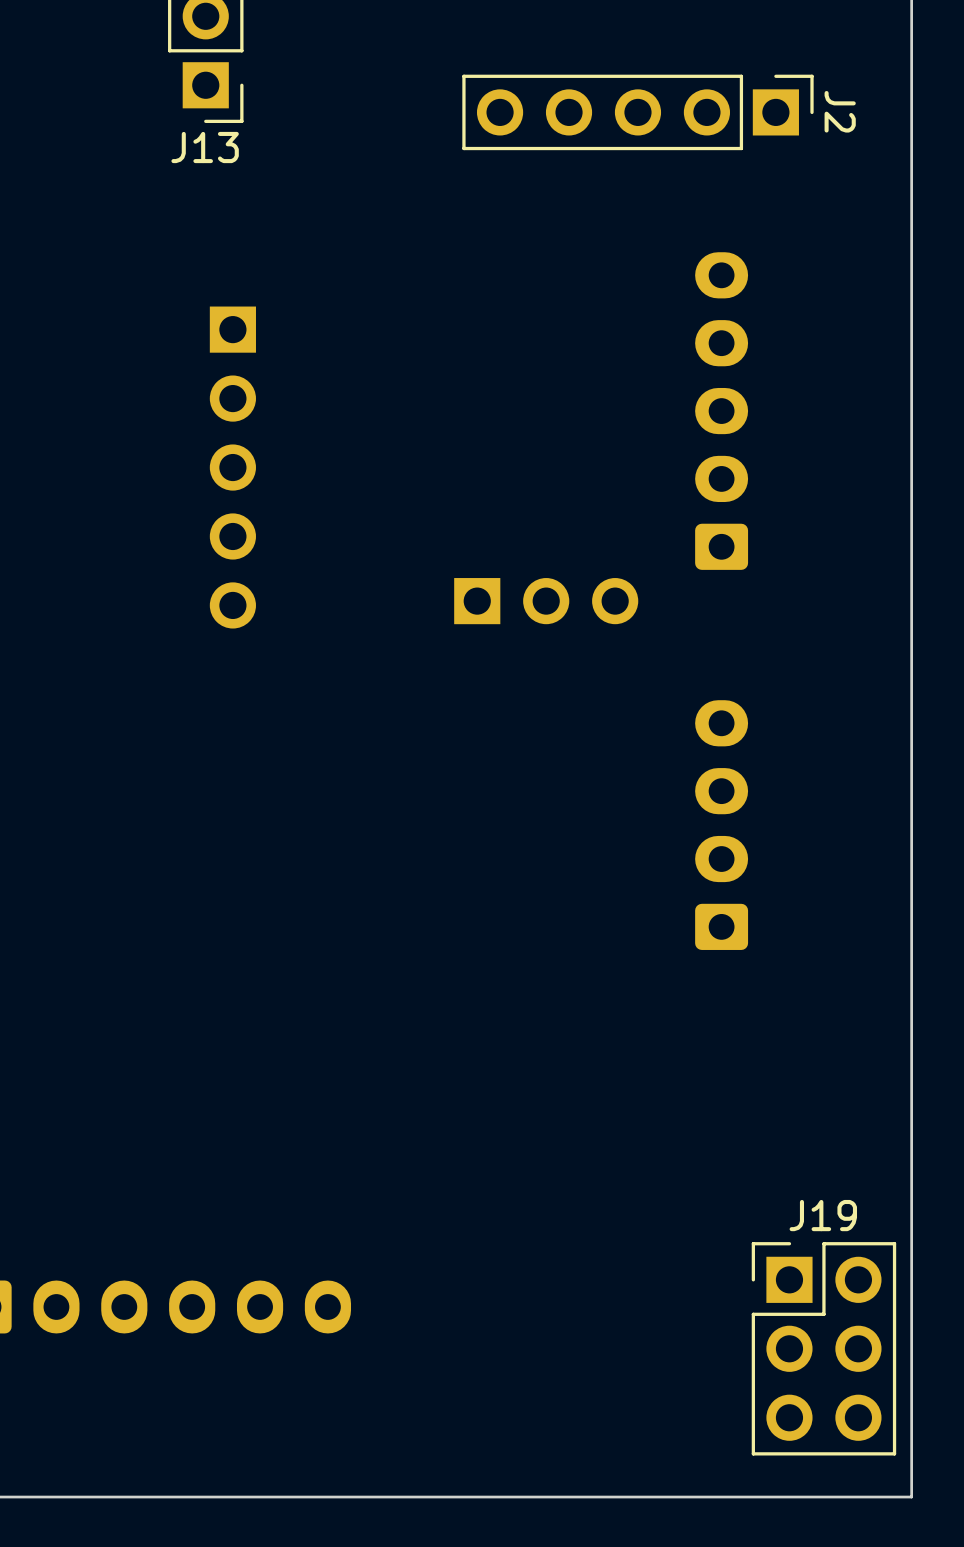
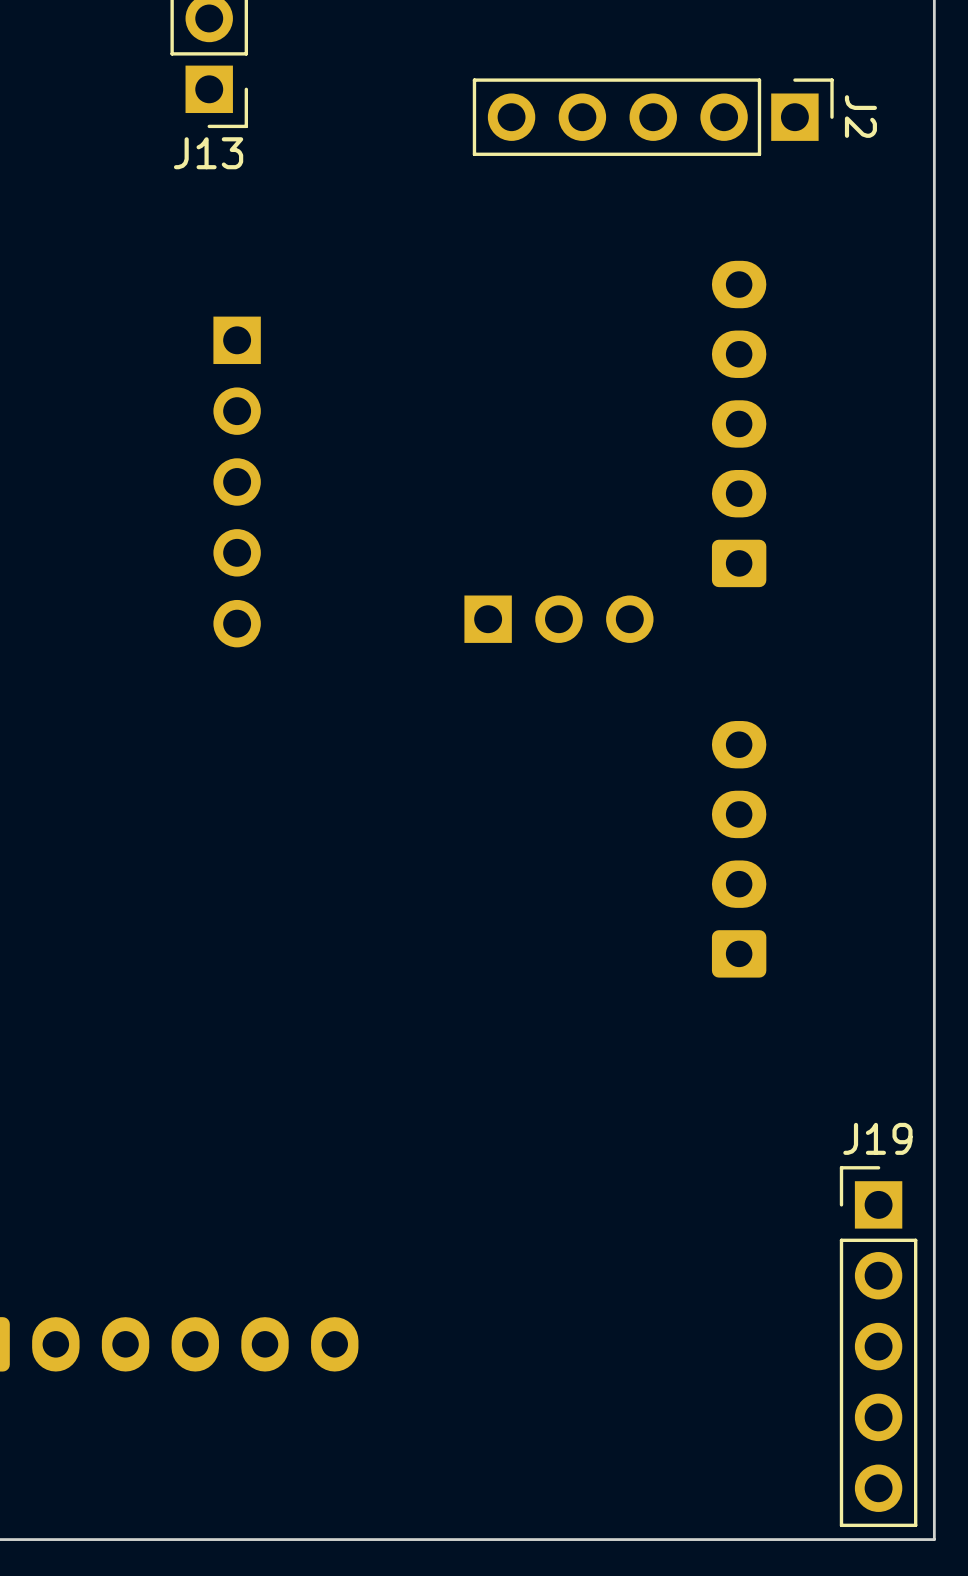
J19 name position: J19 (823, 1215) -> J19 (877, 1138)
J19 footprint: [751, 1242, 897, 1456] -> [839, 1166, 918, 1528]

